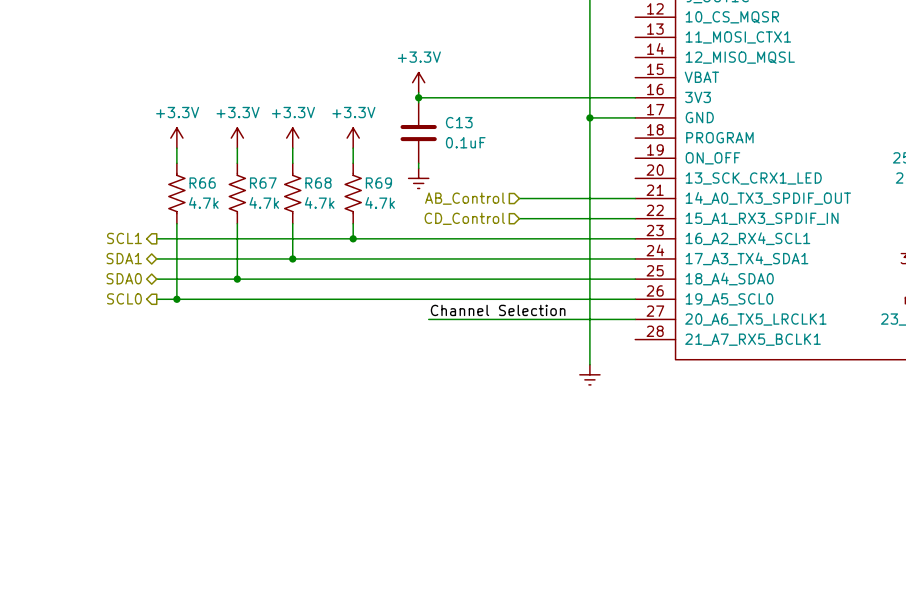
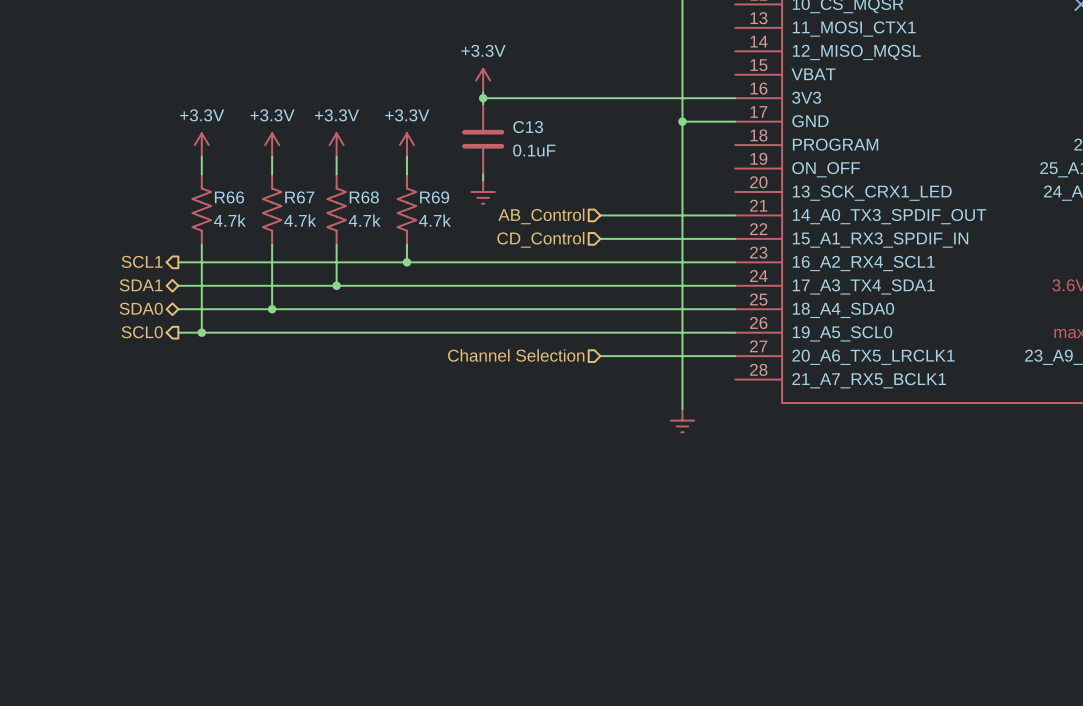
label: Channel Selection (498, 310) -> none
wire: (428, 319) (519, 319) -> none
hierarchical label: none -> Channel Selection (516, 355)

